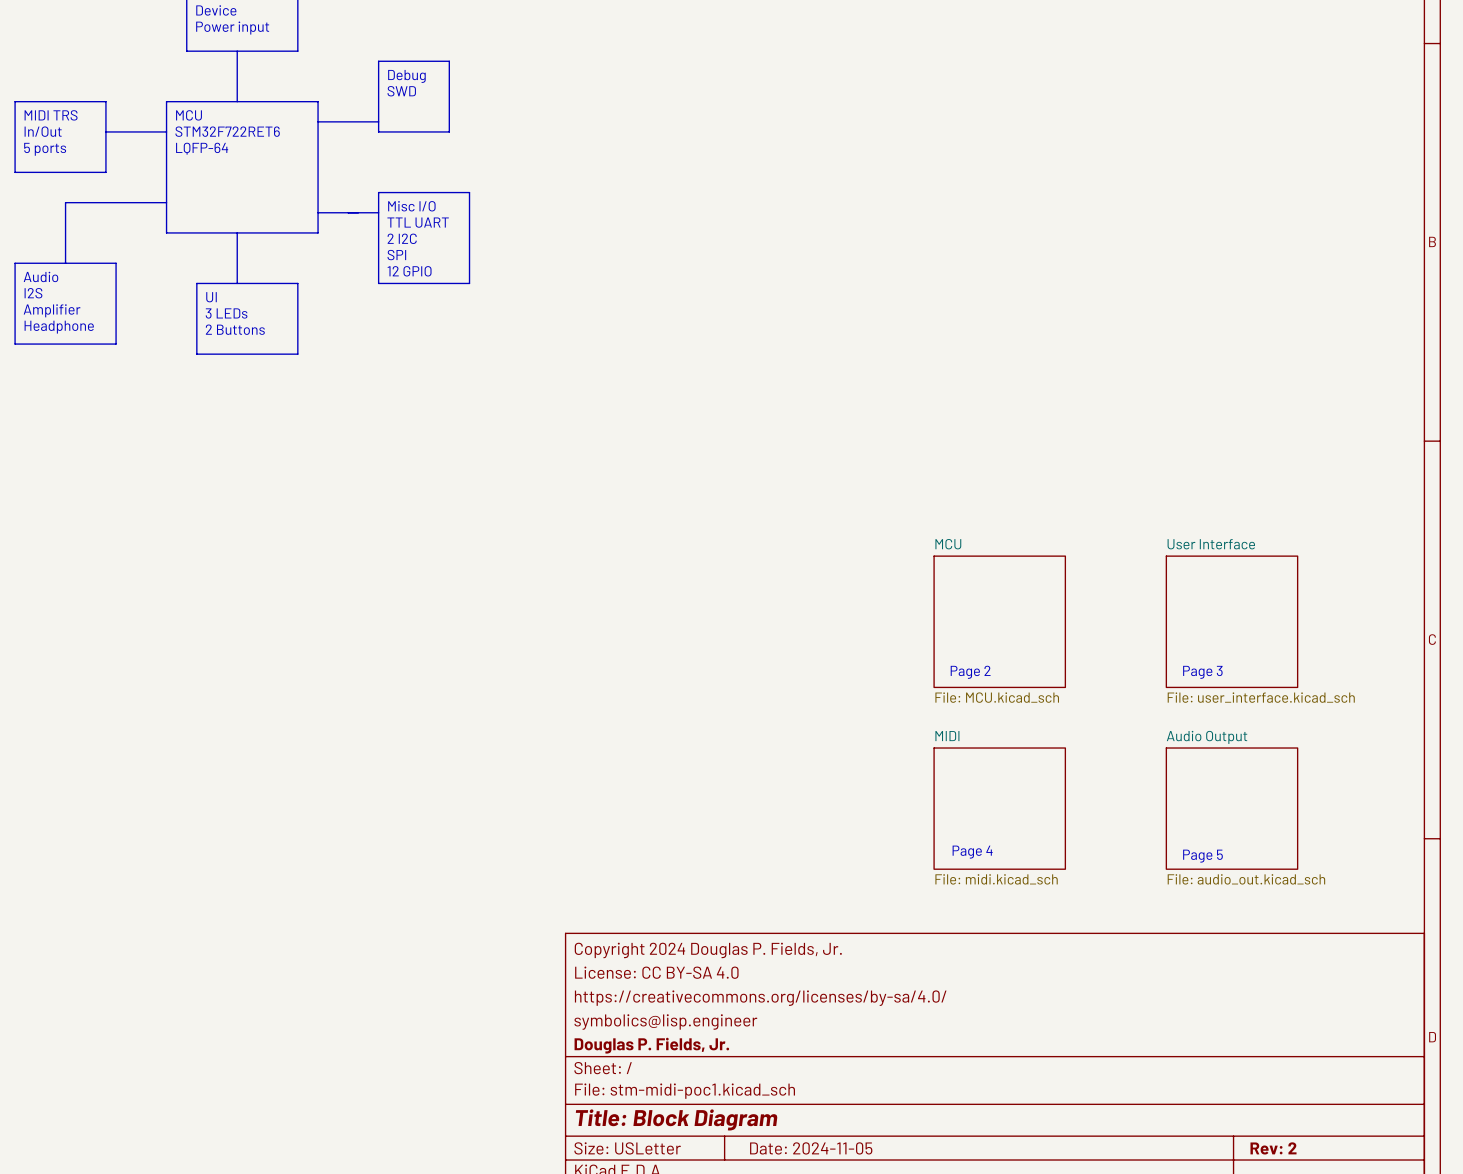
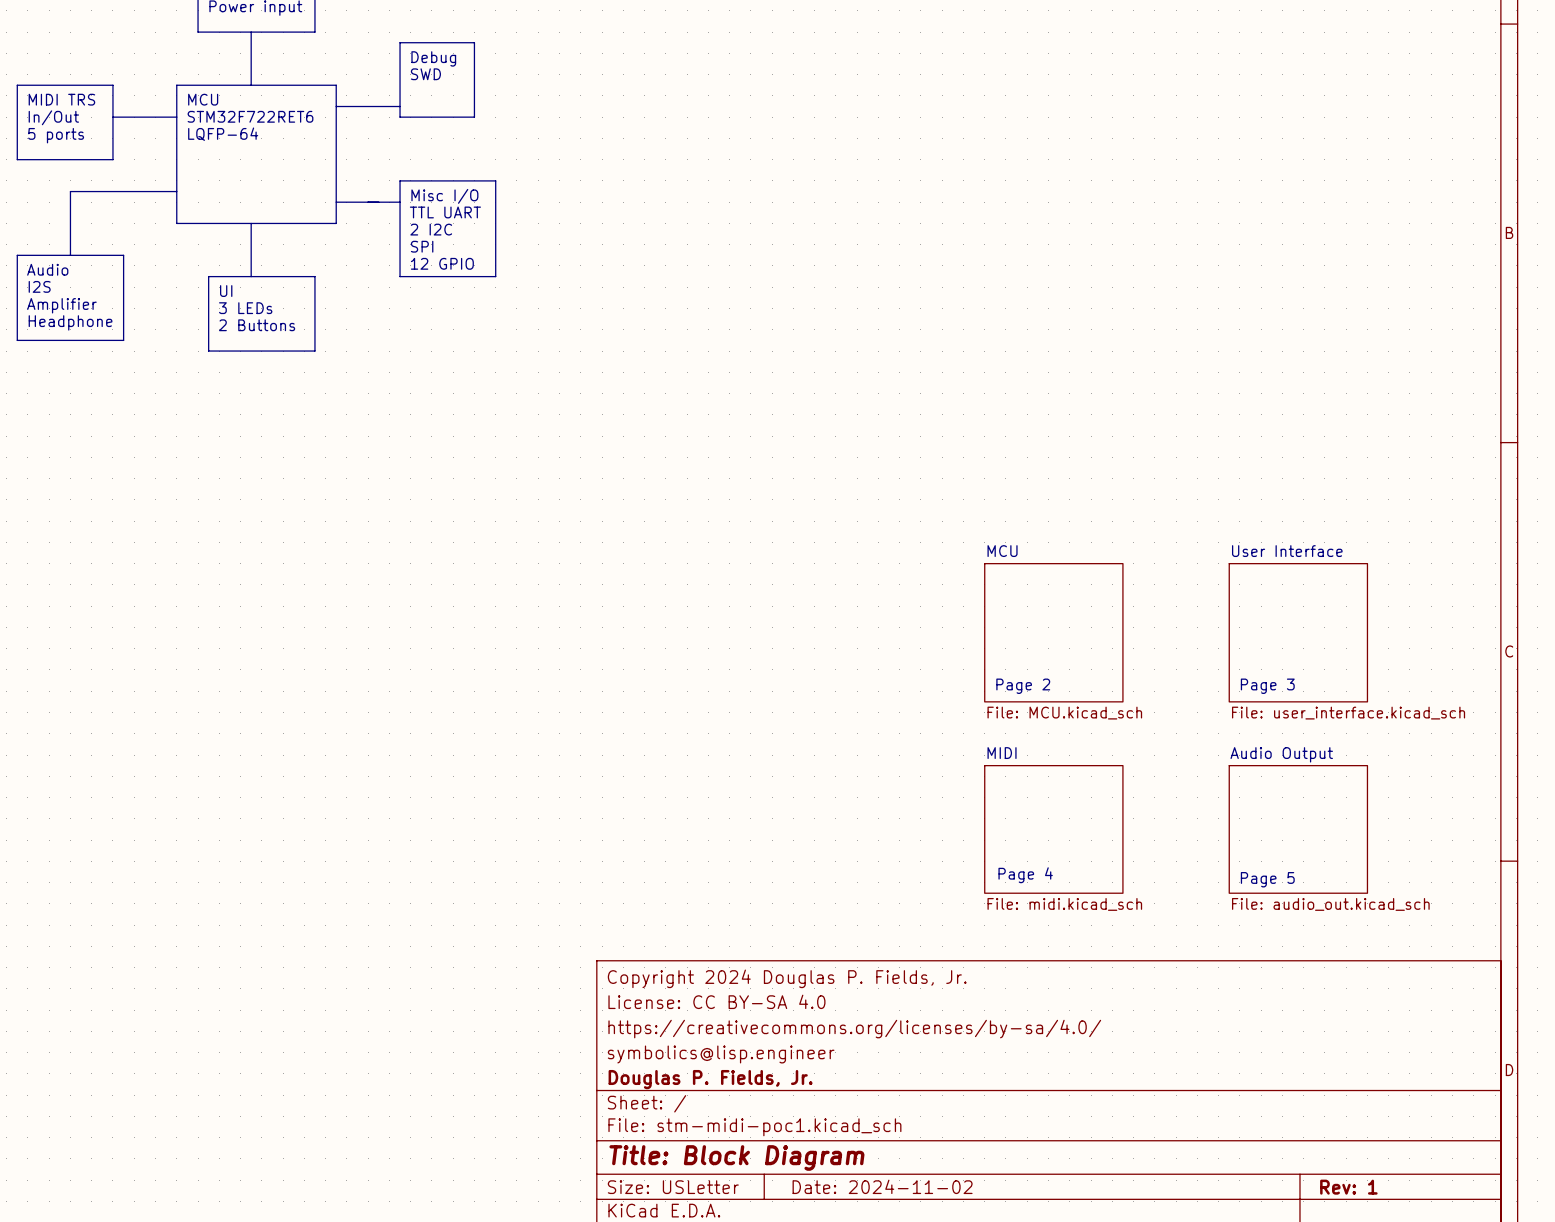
title block: Date: 2024-11-05 (811, 1148) -> Date: 2024-11-02 (882, 1186)
title block: Rev: 2 (1273, 1148) -> Rev: 1 (1348, 1187)

